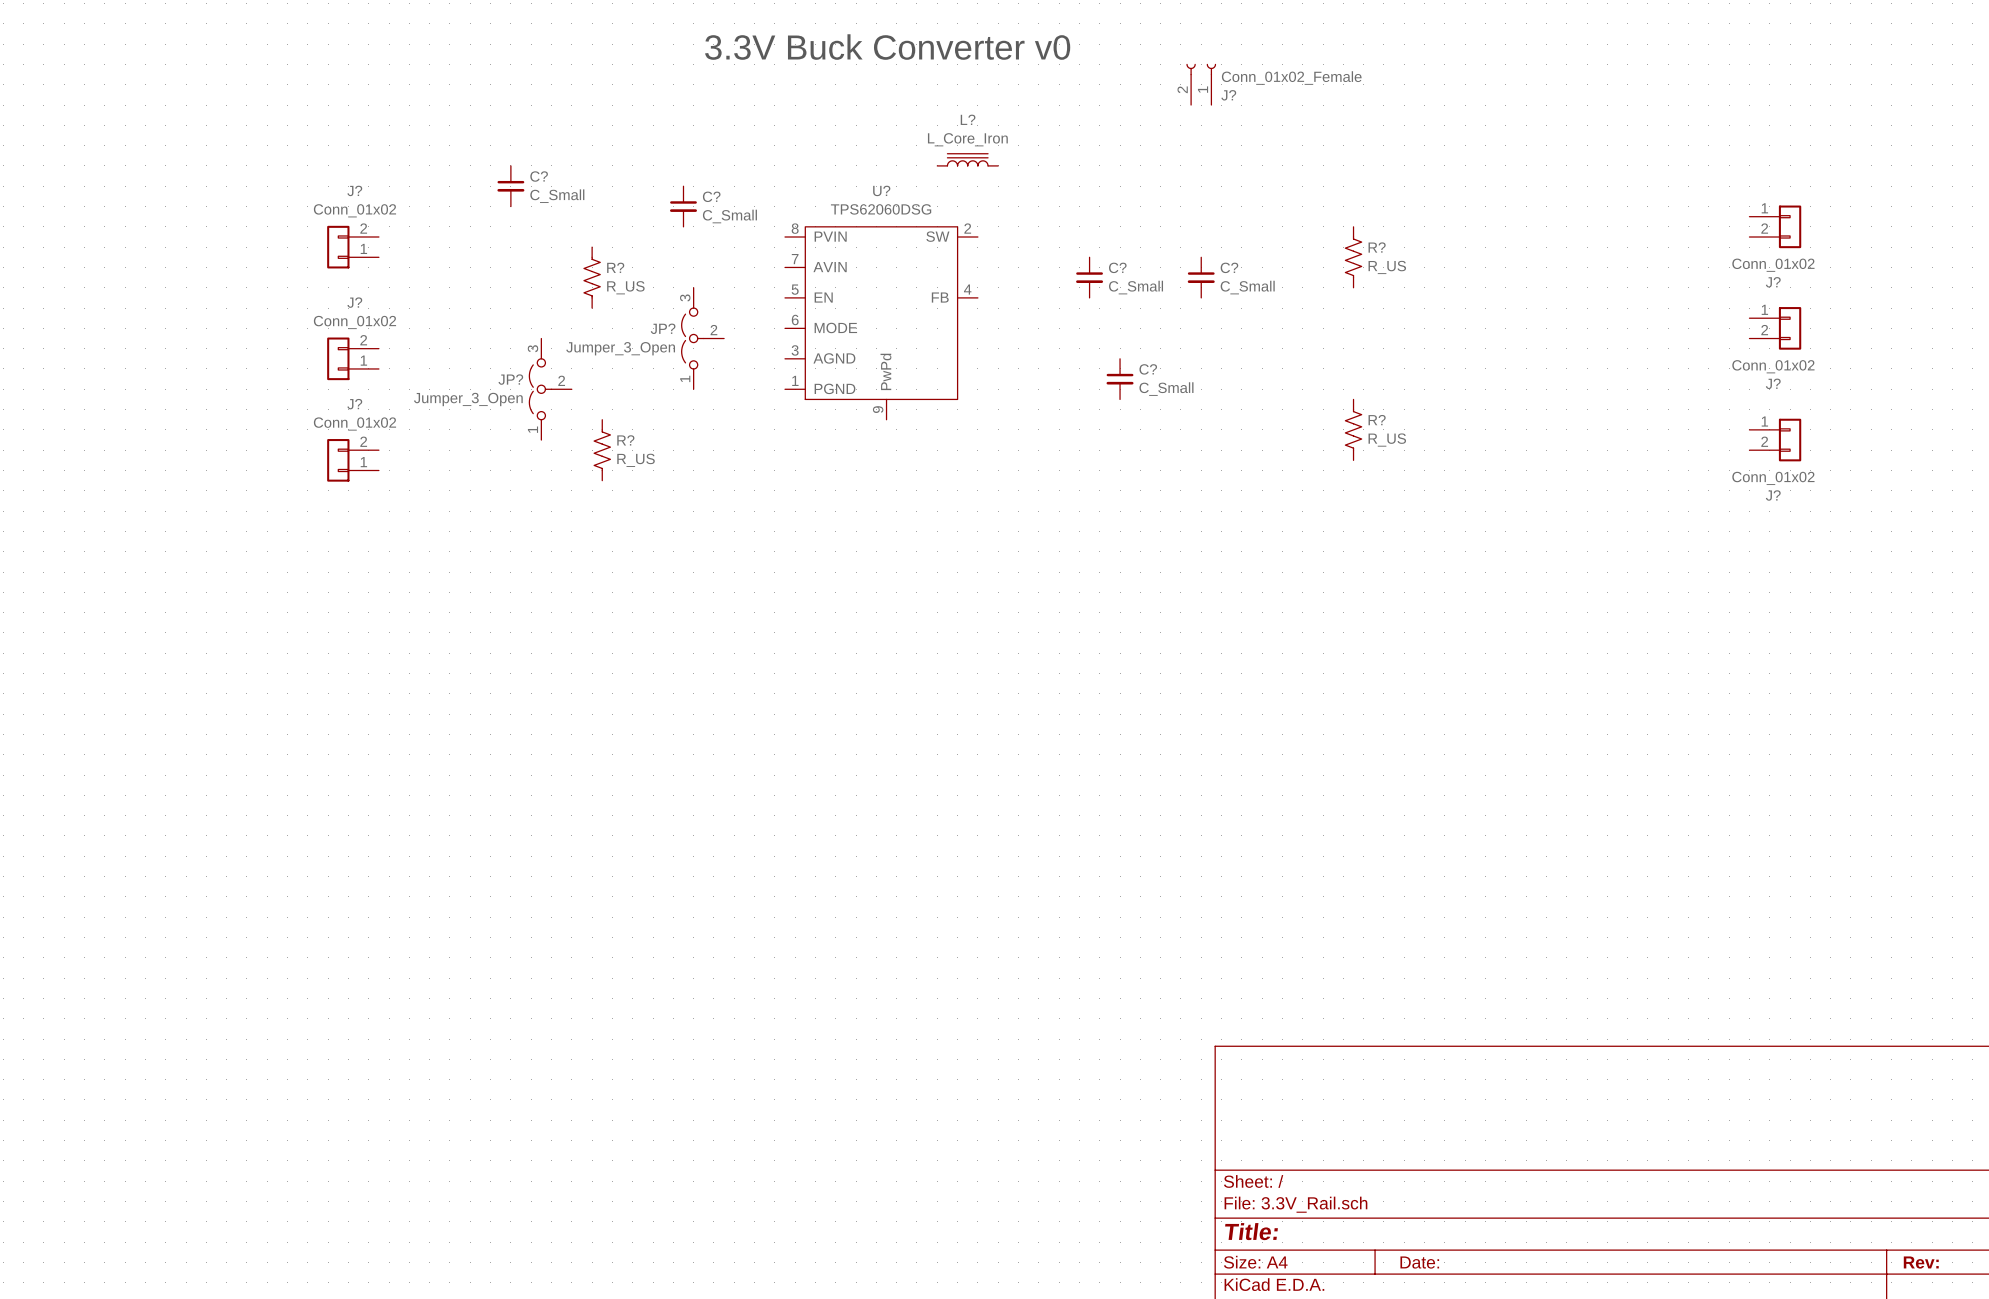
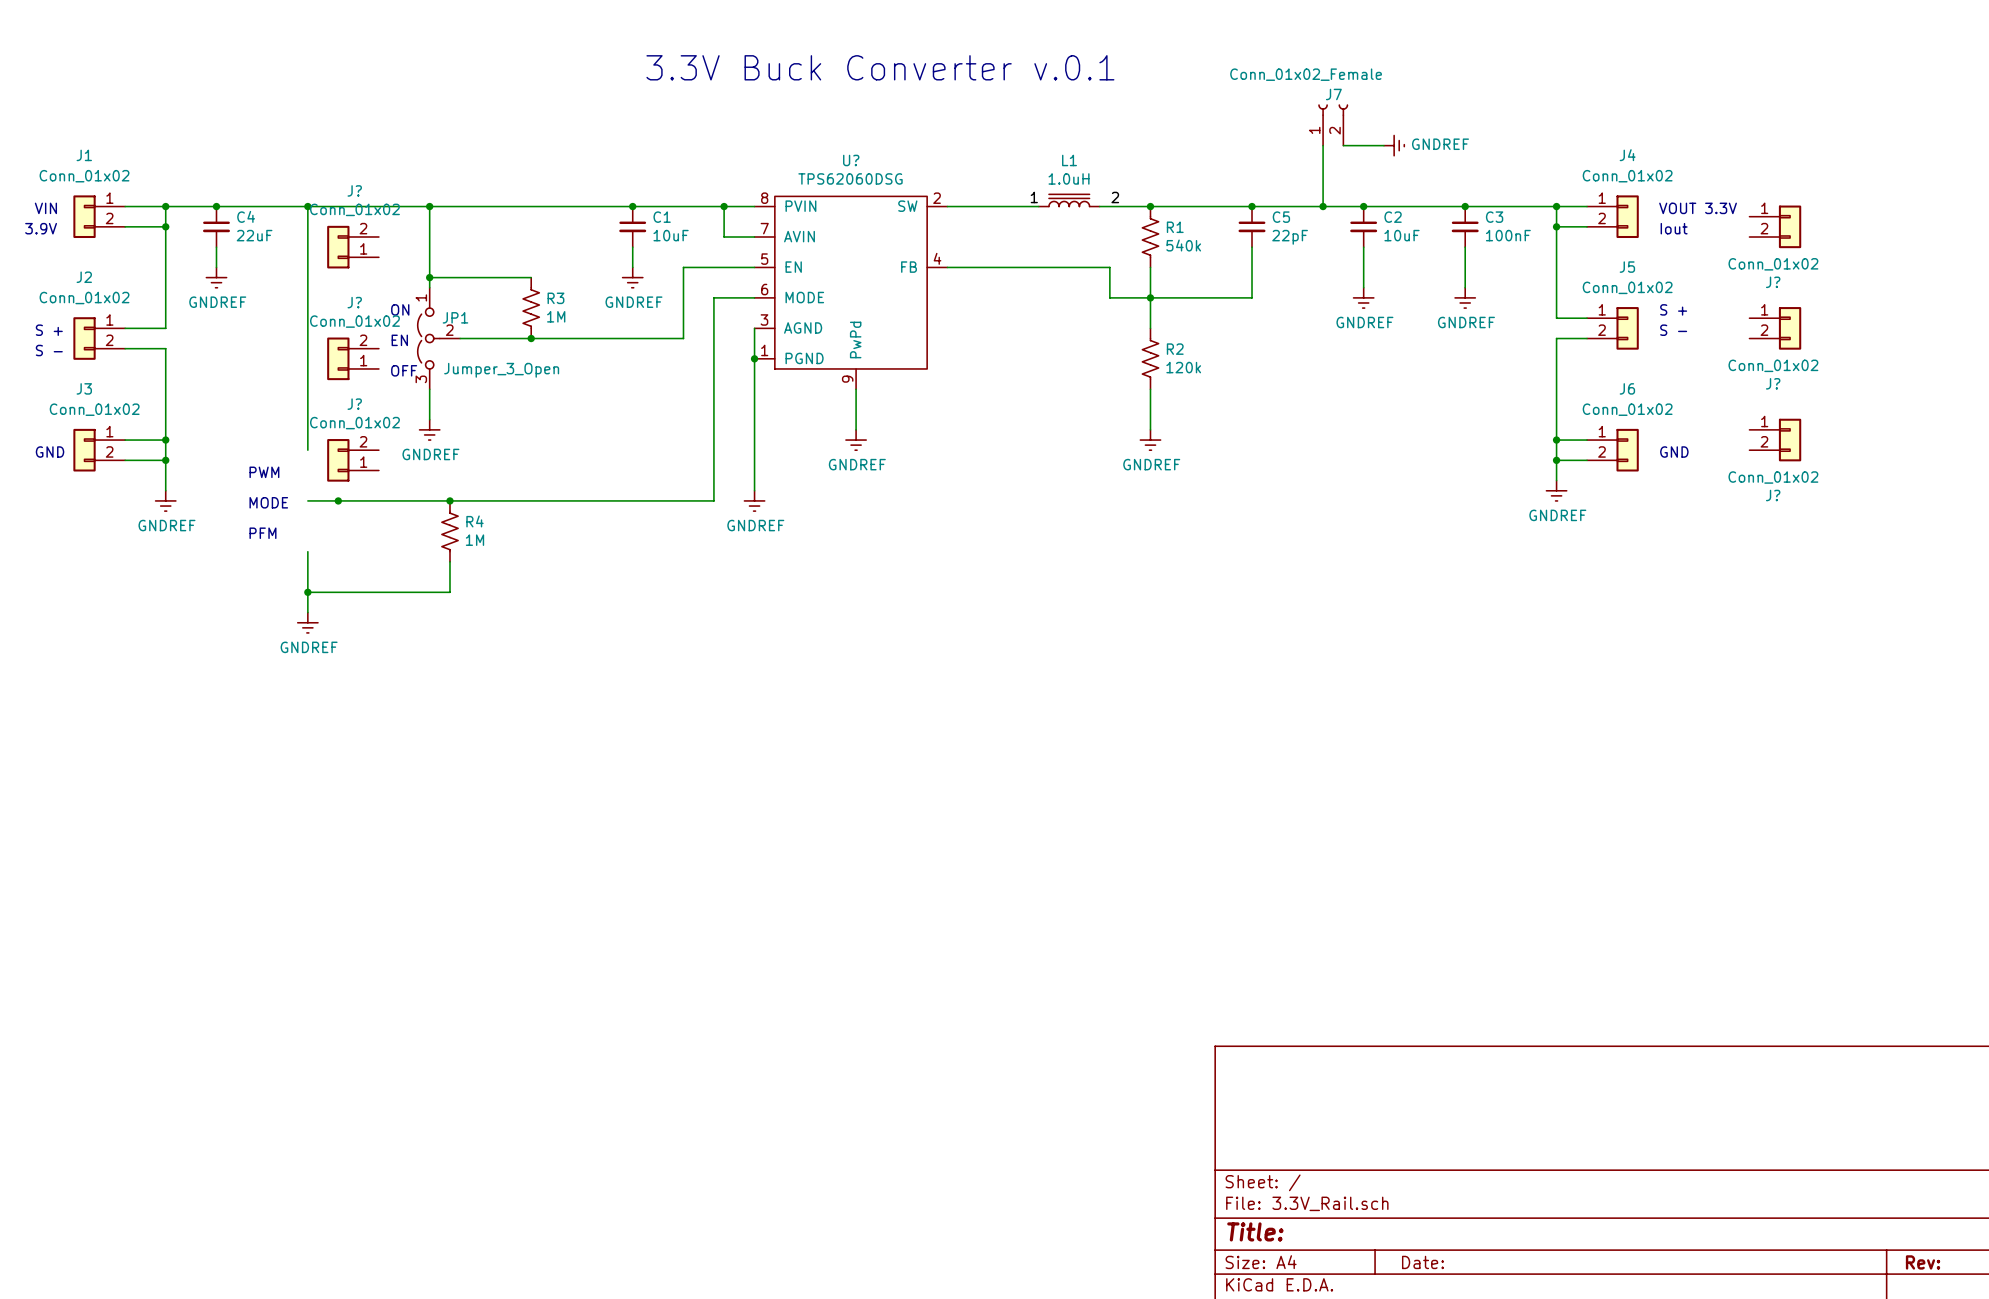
text: 3.3V Buck Converter v0 (887, 47) -> 3.3V Buck Converter v.0.1 (880, 67)
J?: Conn_01x02_Female (1201, 84) -> none
J7: none -> Conn_01x02_Female (1333, 125)
wire: none -> (1323, 145) (1323, 206)
wire: none -> (1343, 145) (1383, 145)
power symbol: none -> GNDREF (1394, 145)
L?: L_Core_Iron (967, 159) -> none
C?: C_Small (510, 186) -> none
label: none -> 1 (1034, 197)
label: none -> 2 (1115, 197)
L1: none -> 1.0uH (1069, 200)
wire: none -> (125, 206) (754, 206)
wire: none -> (165, 206) (165, 328) (125, 328)
junction: none -> (165, 206)
junction: none -> (216, 206)
wire: none -> (307, 206) (307, 450)
junction: none -> (307, 206)
wire: none -> (429, 206) (429, 287)
junction: none -> (429, 206)
junction: none -> (632, 206)
C?: C_Small (683, 206) -> none
wire: none -> (724, 206) (724, 237) (754, 237)
junction: none -> (724, 206)
wire: none -> (947, 206) (1038, 206)
wire: none -> (1099, 206) (1587, 206)
junction: none -> (1150, 206)
junction: none -> (1252, 206)
junction: none -> (1323, 206)
junction: none -> (1363, 206)
junction: none -> (1465, 206)
wire: none -> (1556, 206) (1556, 318) (1587, 318)
junction: none -> (1556, 206)
text: none -> VIN (45, 208)
text: none -> VOUT 3.3V (1698, 208)
J1: none -> Conn_01x02 (99, 216)
J4: none -> Conn_01x02 (1612, 216)
wire: none -> (125, 226) (165, 226)
junction: none -> (165, 226)
C4: none -> 22uF (216, 226)
C1: none -> 10uF (632, 226)
C5: none -> 22pF (1252, 226)
C2: none -> 10uF (1363, 226)
C3: none -> 100nF (1465, 226)
wire: none -> (1556, 226) (1587, 226)
junction: none -> (1556, 226)
text: none -> 3.9V (41, 228)
text: none -> Iout (1674, 228)
R1: none -> 540k (1150, 237)
wire: none -> (216, 247) (216, 267)
wire: none -> (632, 247) (632, 267)
wire: none -> (1252, 247) (1252, 297) (1109, 297) (1109, 267) (947, 267)
wire: none -> (1363, 247) (1363, 287)
wire: none -> (1465, 247) (1465, 287)
R?: R_US (1353, 257) -> none
wire: none -> (754, 267) (683, 267) (683, 338) (460, 338)
wire: none -> (1150, 267) (1150, 328)
power symbol: none -> GNDREF (216, 277)
wire: none -> (429, 277) (531, 277)
junction: none -> (429, 277)
R?: R_US (592, 277) -> none
power symbol: none -> GNDREF (632, 277)
C?: C_Small (1089, 277) -> none
C?: C_Small (1201, 277) -> none
wire: none -> (754, 297) (713, 297) (713, 500) (307, 500)
junction: none -> (1150, 297)
power symbol: none -> GNDREF (1363, 297)
power symbol: none -> GNDREF (1465, 297)
R3: none -> 1M (531, 308)
text: none -> ON (400, 309)
text: none -> S + (1673, 309)
U? position: (881, 323) -> (850, 292)
wire: none -> (754, 328) (754, 490)
J5: none -> Conn_01x02 (1612, 328)
text: none -> S + (49, 330)
text: none -> S - (1673, 330)
J2: none -> Conn_01x02 (99, 338)
JP1: none -> Jumper_3_Open (438, 338)
junction: none -> (531, 338)
JP?: Jumper_3_Open (702, 338) -> none
wire: none -> (1587, 338) (1556, 338) (1556, 480)
text: none -> EN (399, 340)
wire: none -> (125, 348) (165, 348) (165, 490)
text: none -> S - (49, 350)
junction: none -> (754, 358)
R2: none -> 120k (1150, 358)
text: none -> OFF (404, 370)
C?: C_Small (1120, 379) -> none
wire: none -> (429, 389) (429, 419)
JP?: Jumper_3_Open (550, 389) -> none
wire: none -> (856, 389) (856, 429)
wire: none -> (1150, 389) (1150, 429)
power symbol: none -> GNDREF (429, 429)
R?: R_US (1353, 429) -> none
wire: none -> (125, 440) (165, 440)
junction: none -> (165, 440)
power symbol: none -> GNDREF (856, 440)
power symbol: none -> GNDREF (1150, 440)
wire: none -> (1556, 440) (1587, 440)
junction: none -> (1556, 440)
J3: none -> Conn_01x02 (99, 450)
R?: R_US (602, 450) -> none
J6: none -> Conn_01x02 (1612, 450)
text: none -> GND (50, 452)
text: none -> GND (1674, 452)
wire: none -> (125, 460) (165, 460)
junction: none -> (165, 460)
wire: none -> (1556, 460) (1587, 460)
junction: none -> (1556, 460)
text: none -> PWM (264, 472)
power symbol: none -> GNDREF (1556, 490)
power symbol: none -> GNDREF (165, 500)
junction: none -> (338, 500)
junction: none -> (449, 500)
power symbol: none -> GNDREF (754, 500)
text: none -> MODE (268, 502)
R4: none -> 1M (449, 531)
text: none -> PFM (262, 533)
wire: none -> (307, 551) (307, 612)
wire: none -> (449, 561) (449, 592) (307, 592)
junction: none -> (307, 592)
power symbol: none -> GNDREF (307, 622)

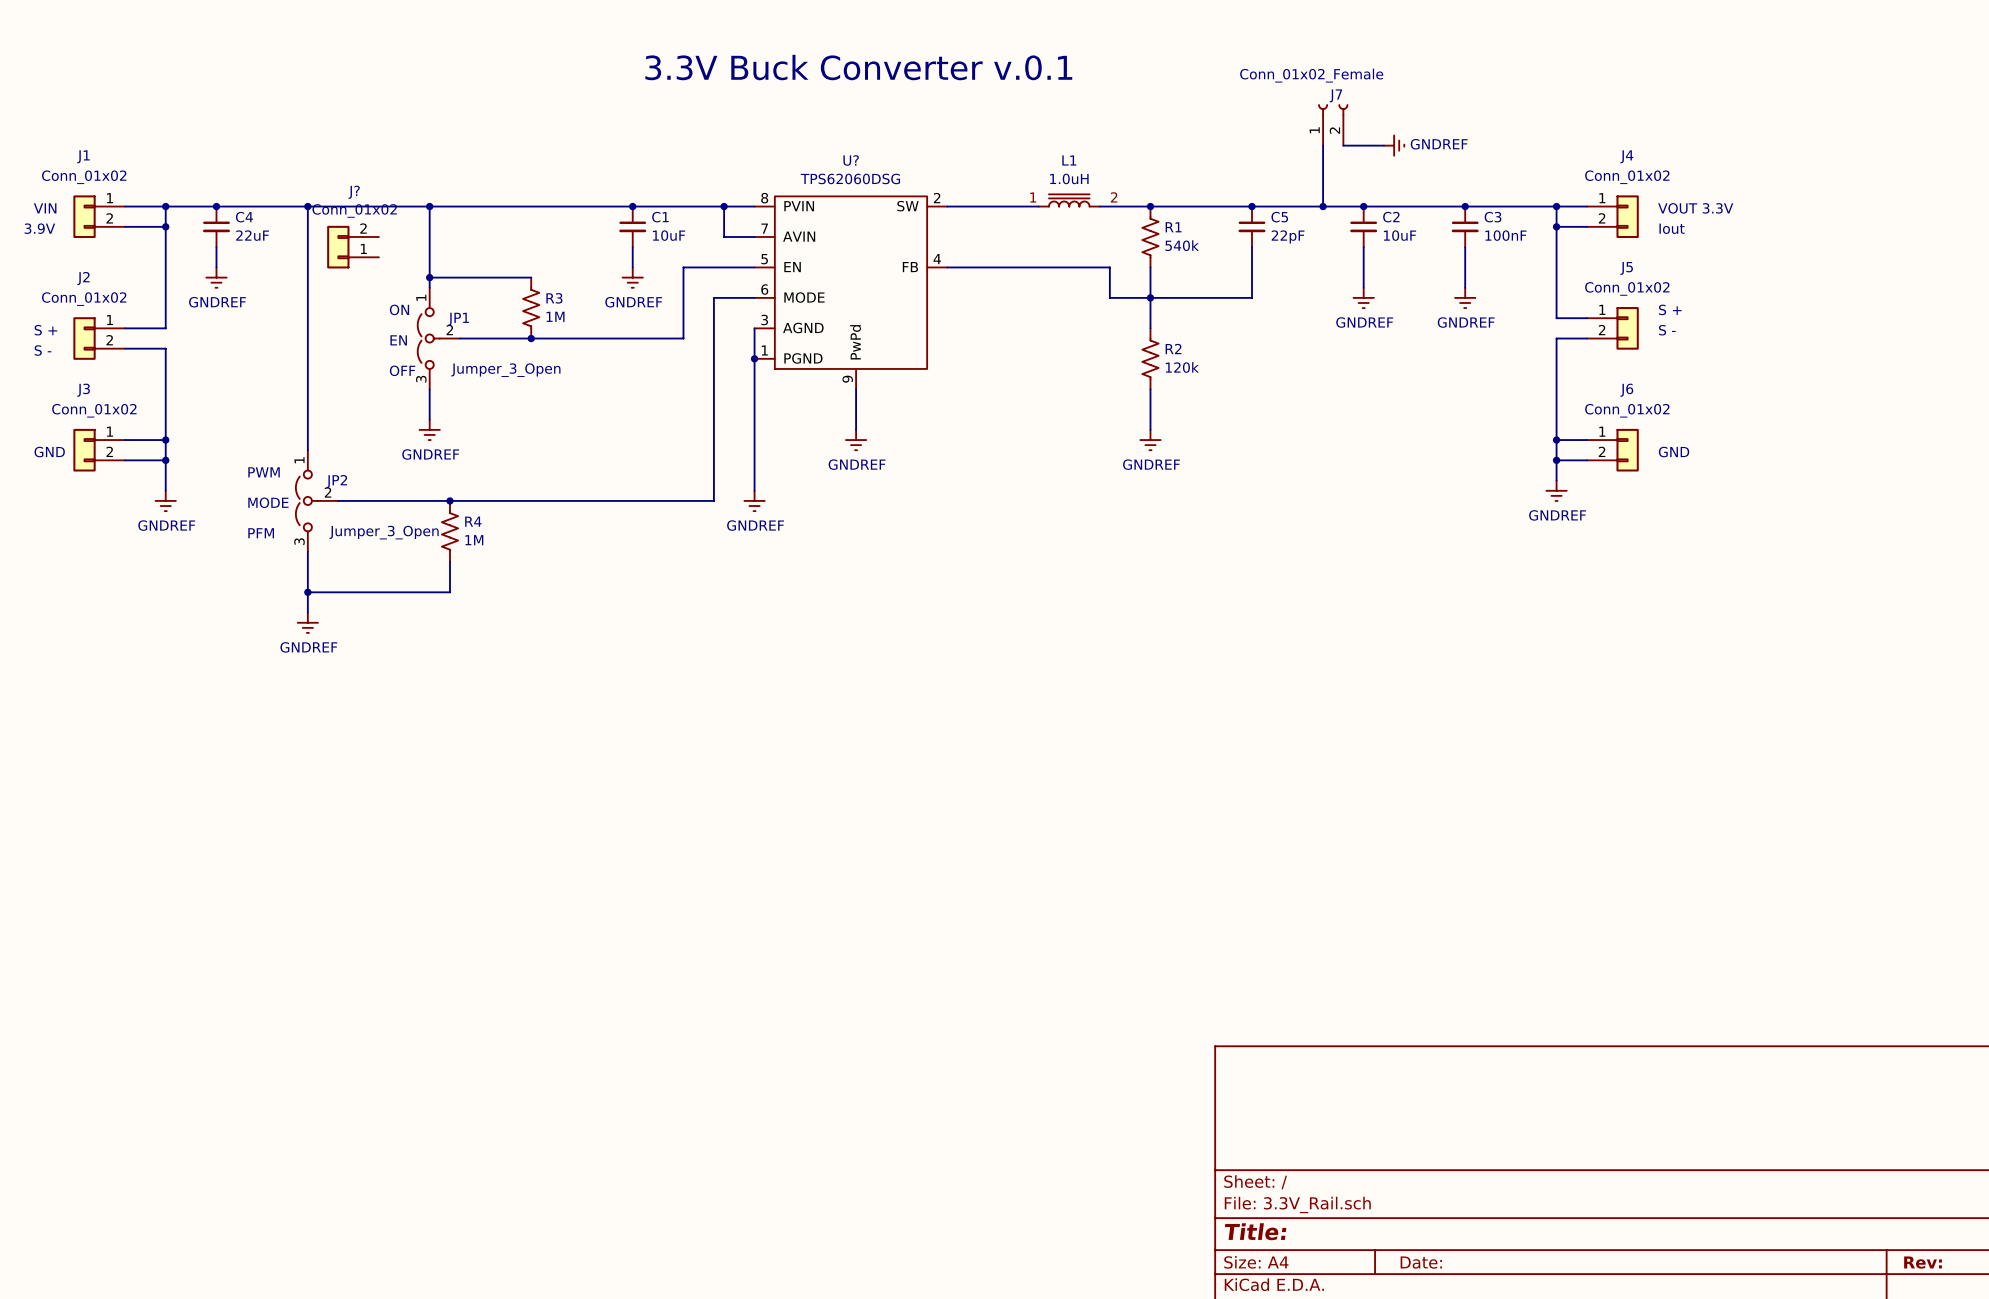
J?: Conn_01x02 (1775, 226) -> none
J?: Conn_01x02 (1775, 328) -> none
J?: Conn_01x02 (353, 358) -> none
J?: Conn_01x02 (1775, 440) -> none
J?: Conn_01x02 (353, 460) -> none
JP2: none -> Jumper_3_Open (317, 500)
junction: (338, 500) -> none

